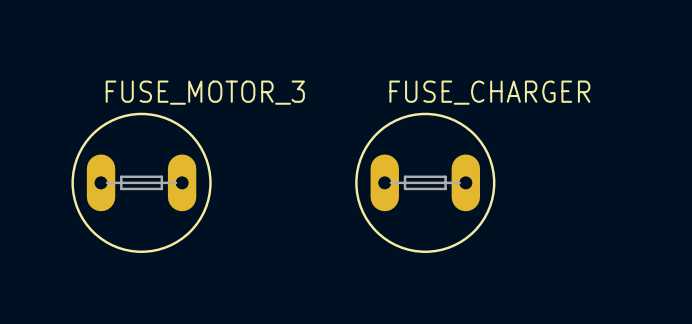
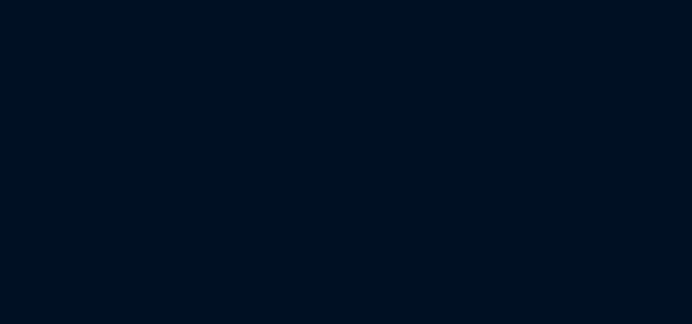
FUSE_MOTOR_3: (141, 182) -> none
FUSE_CHARGER: (425, 182) -> none

